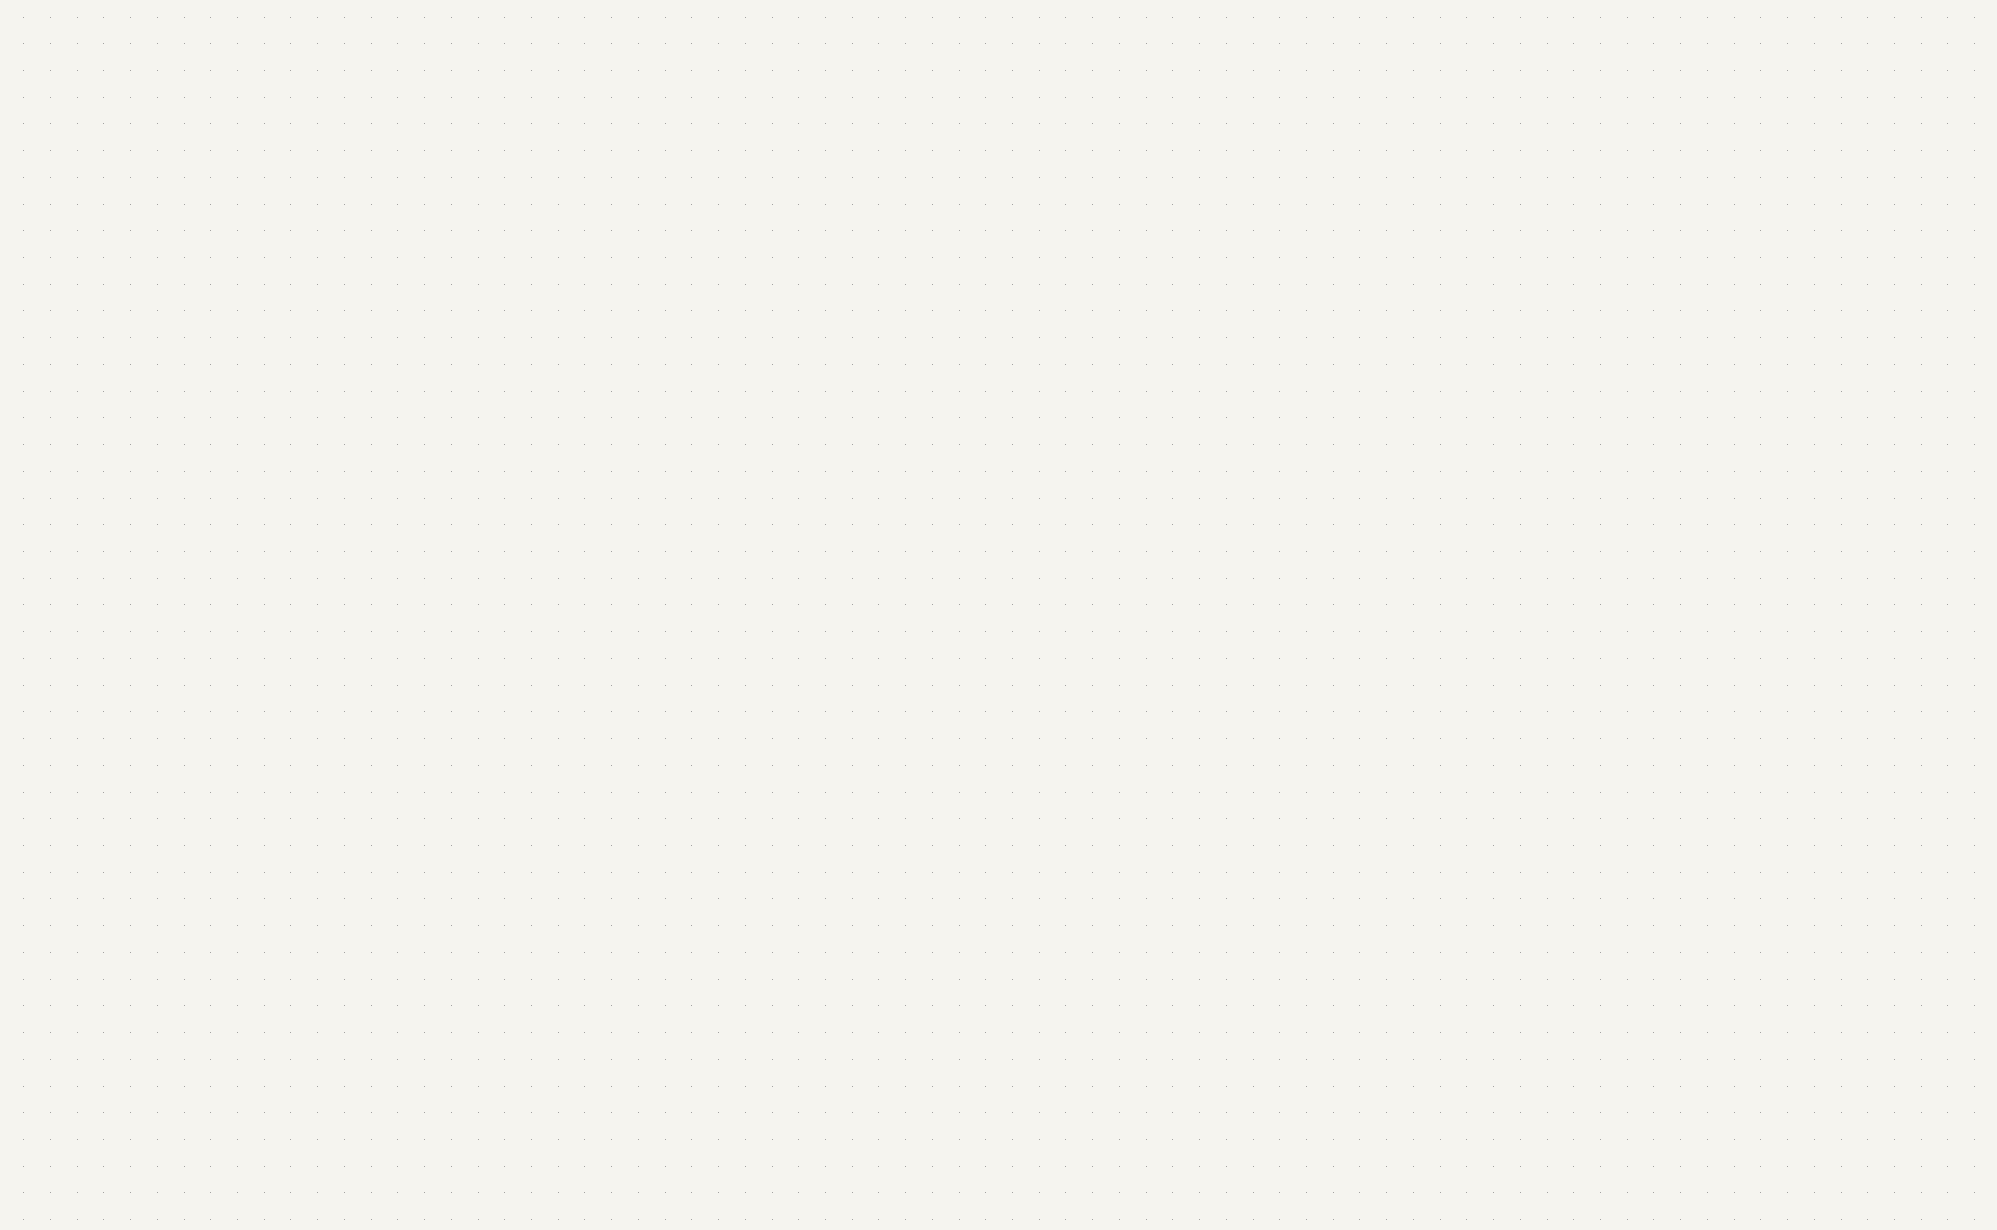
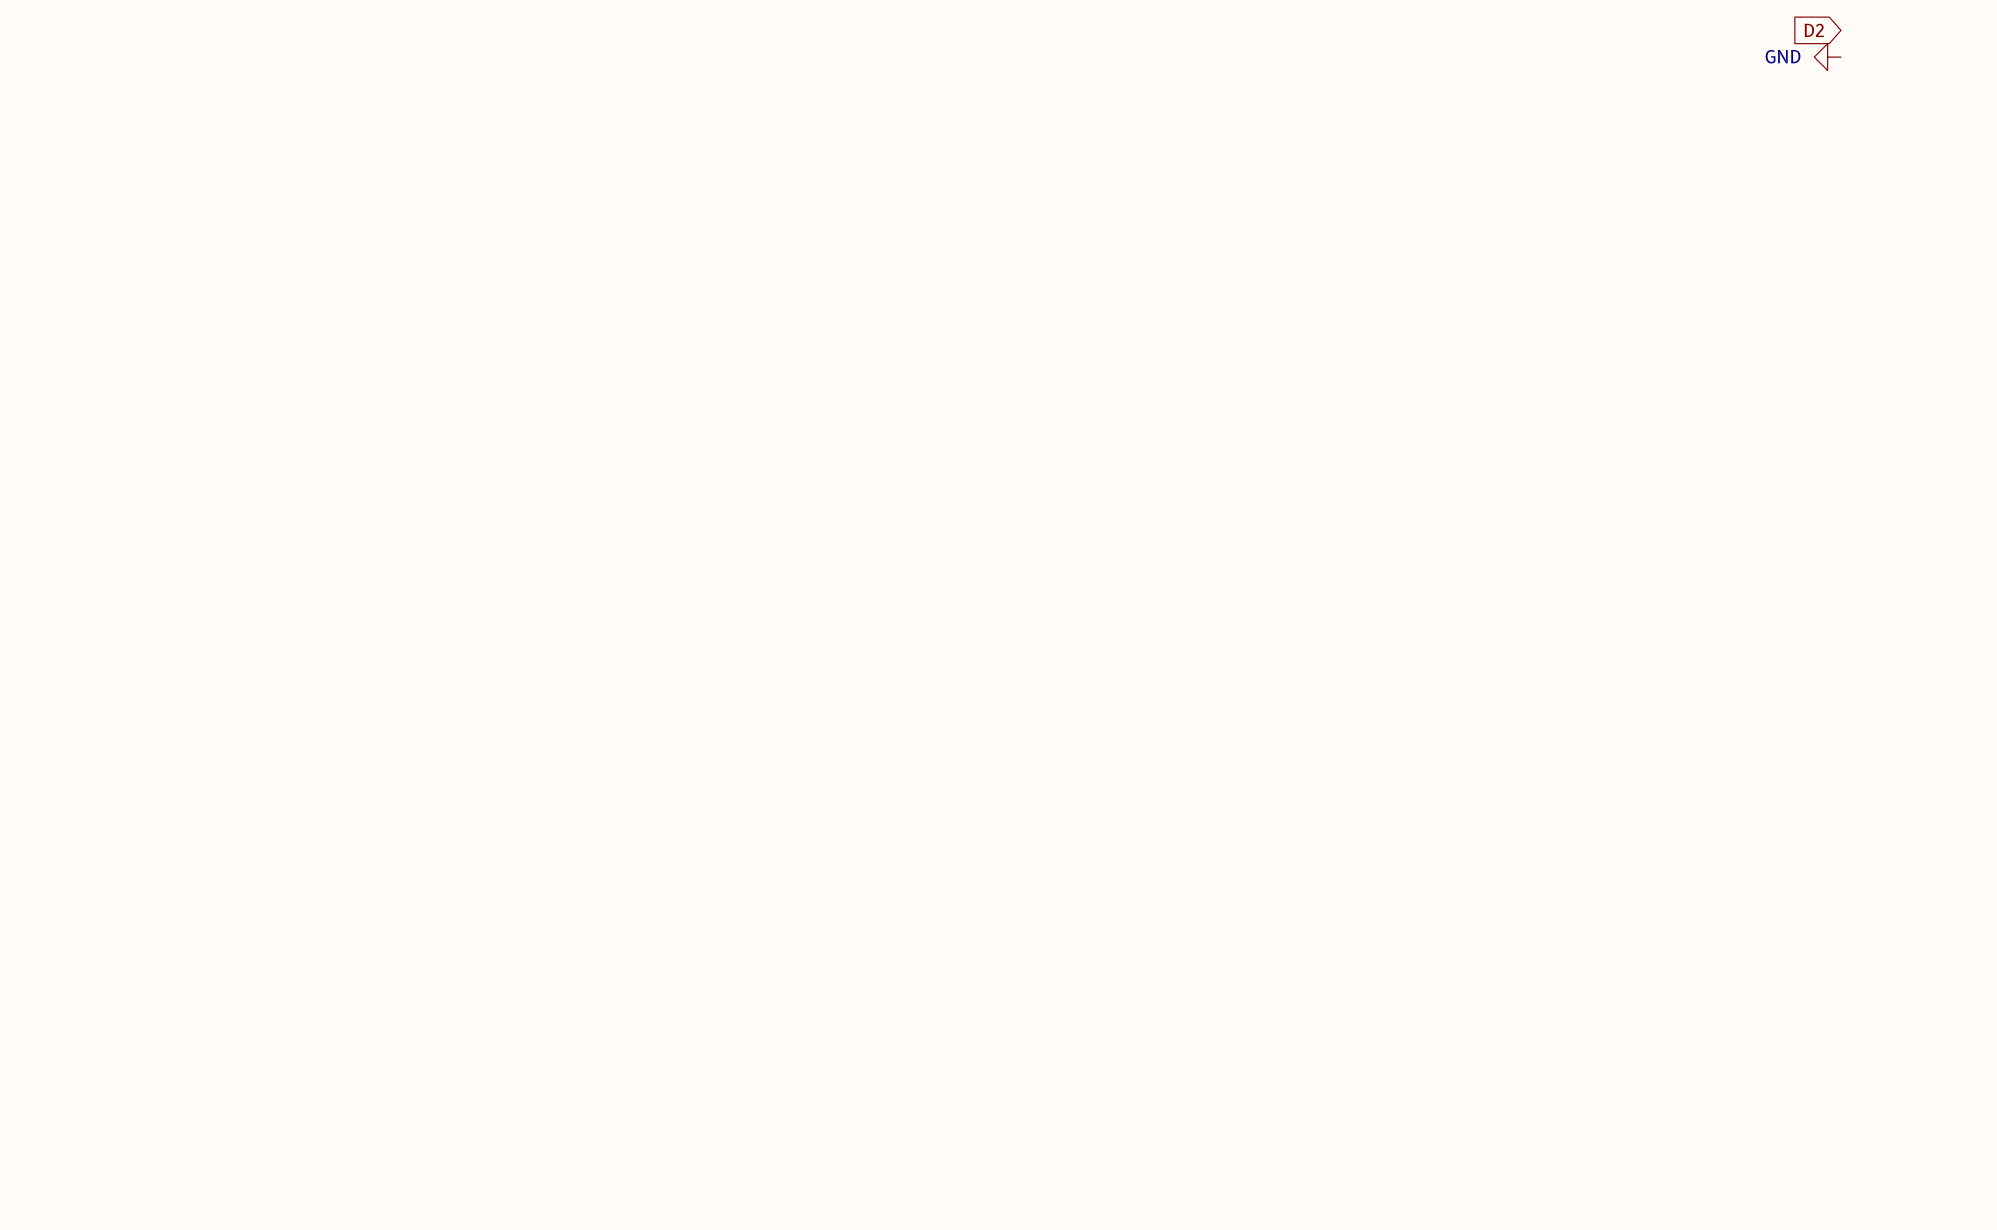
global label: none -> D2 (1814, 30)
power symbol: none -> GND (1827, 57)

